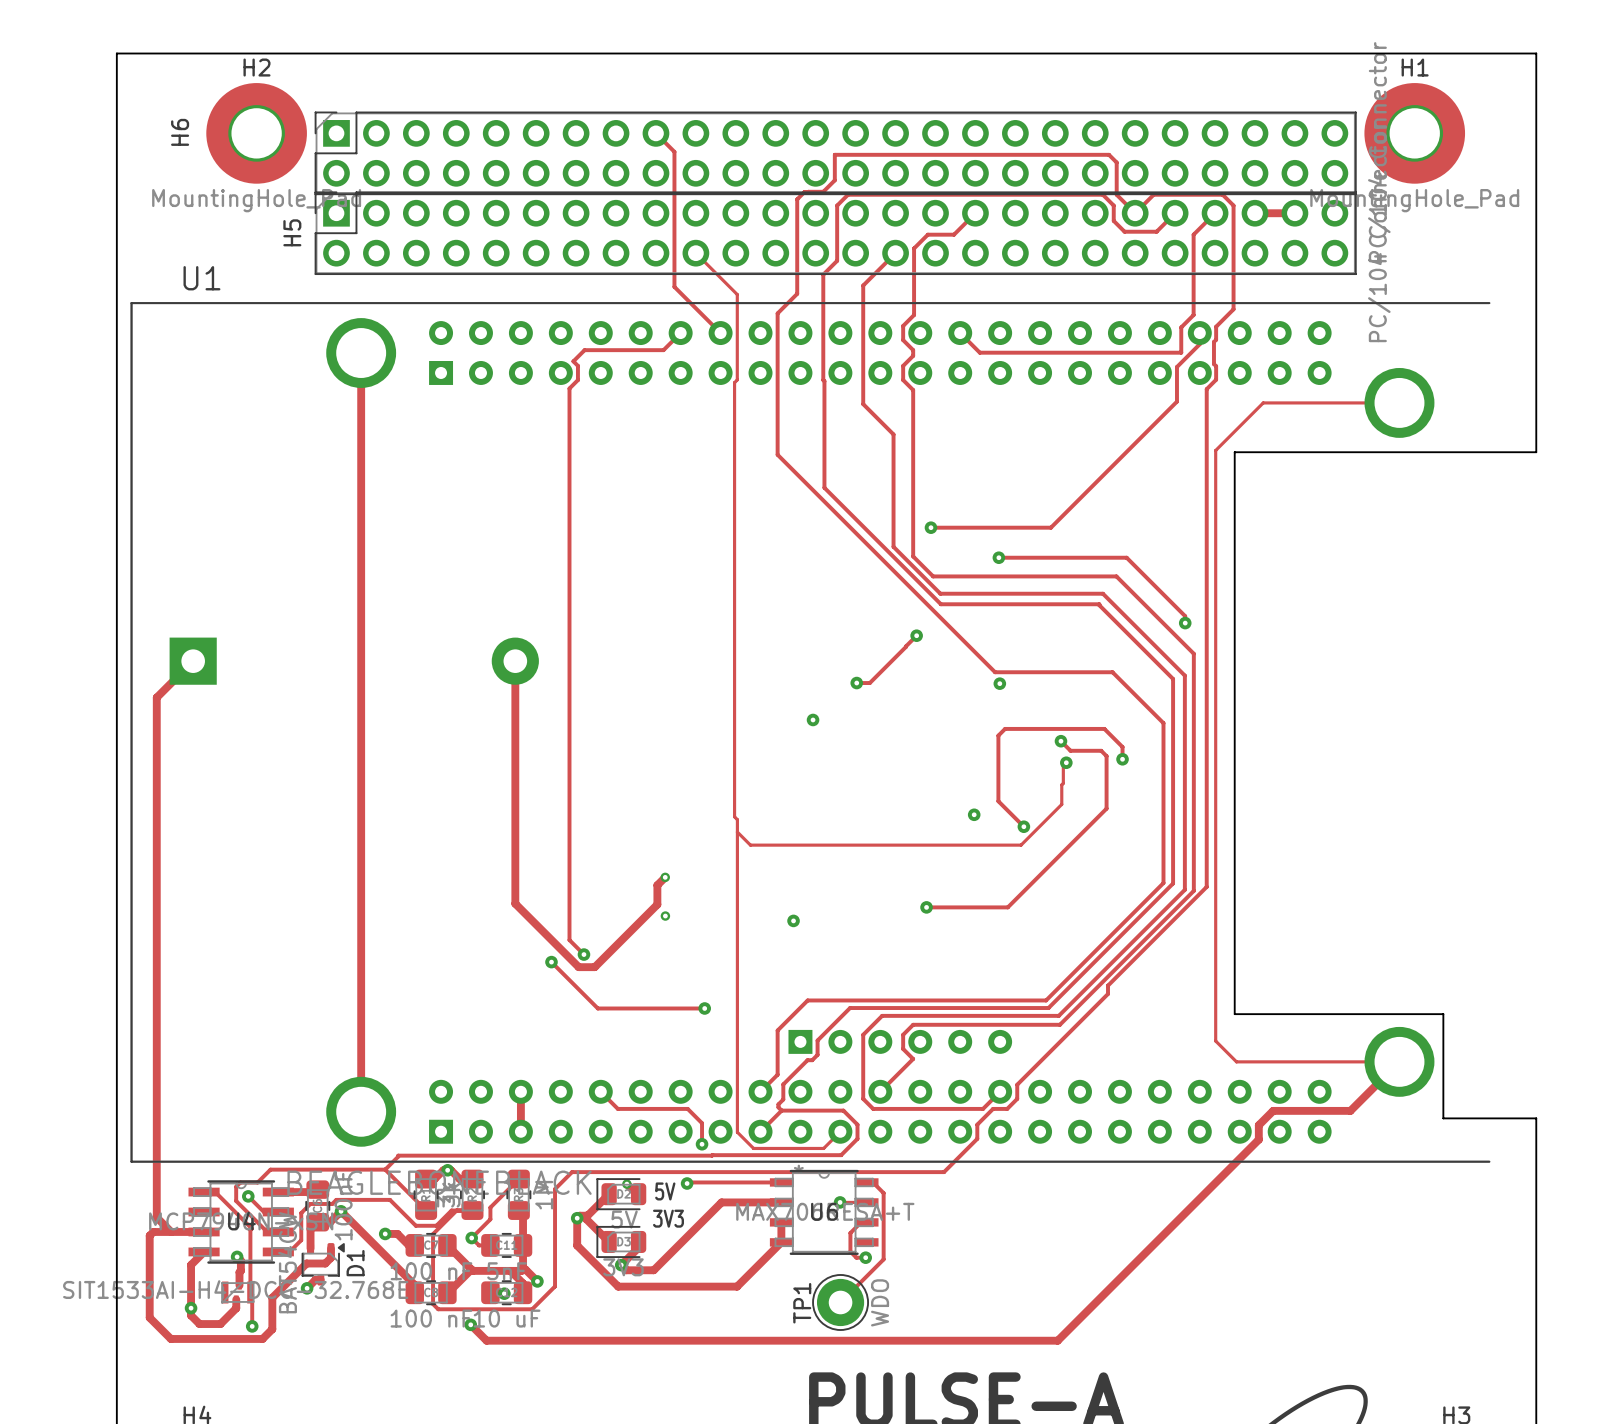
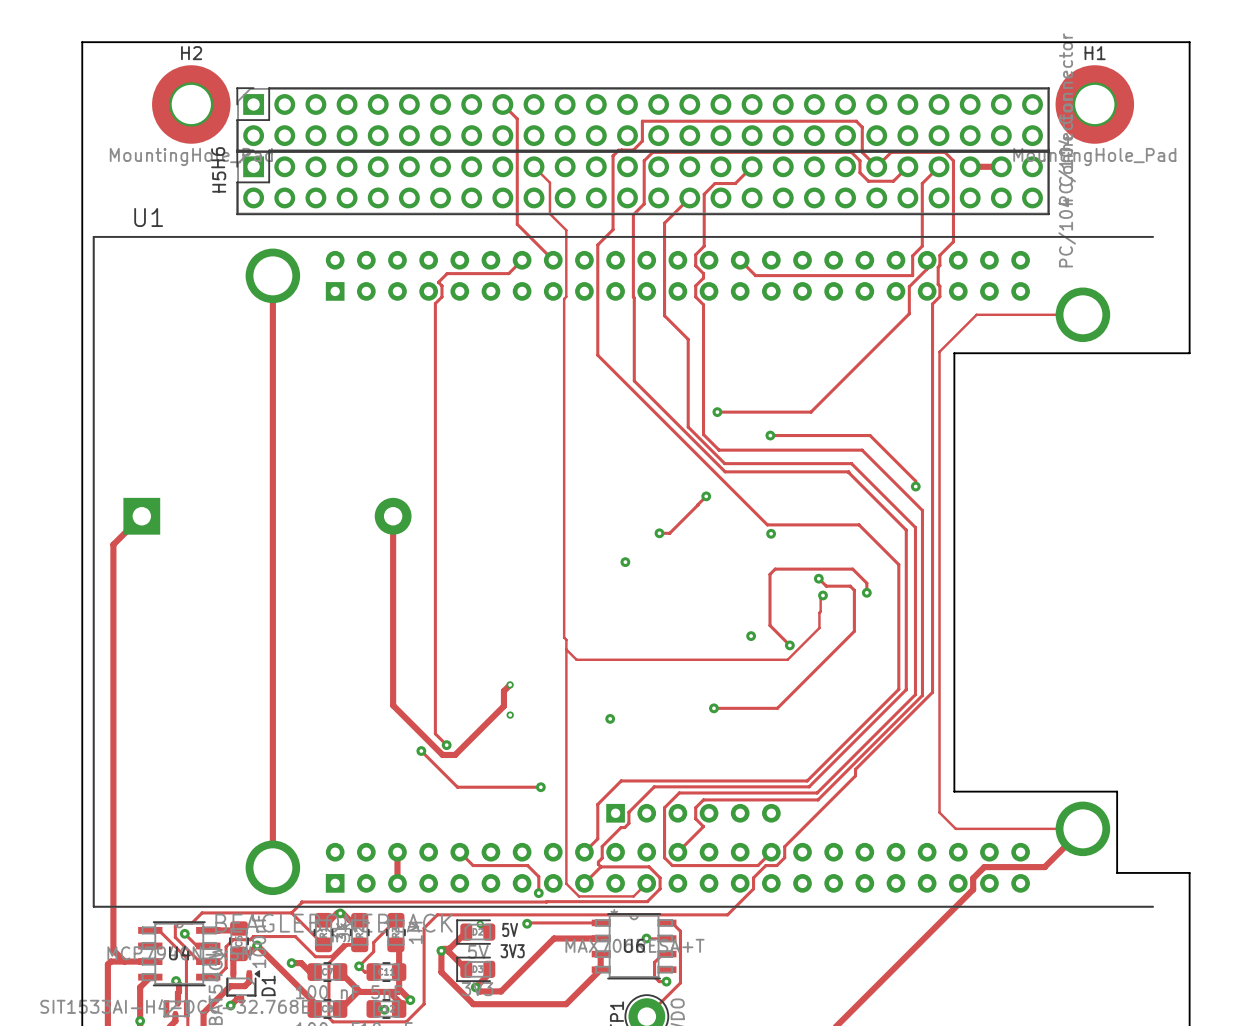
H6 name position: H6 (180, 132) -> H6 (218, 157)
track: (695, 253) (716, 273) -> (534, 166) (549, 182) (549, 213)

